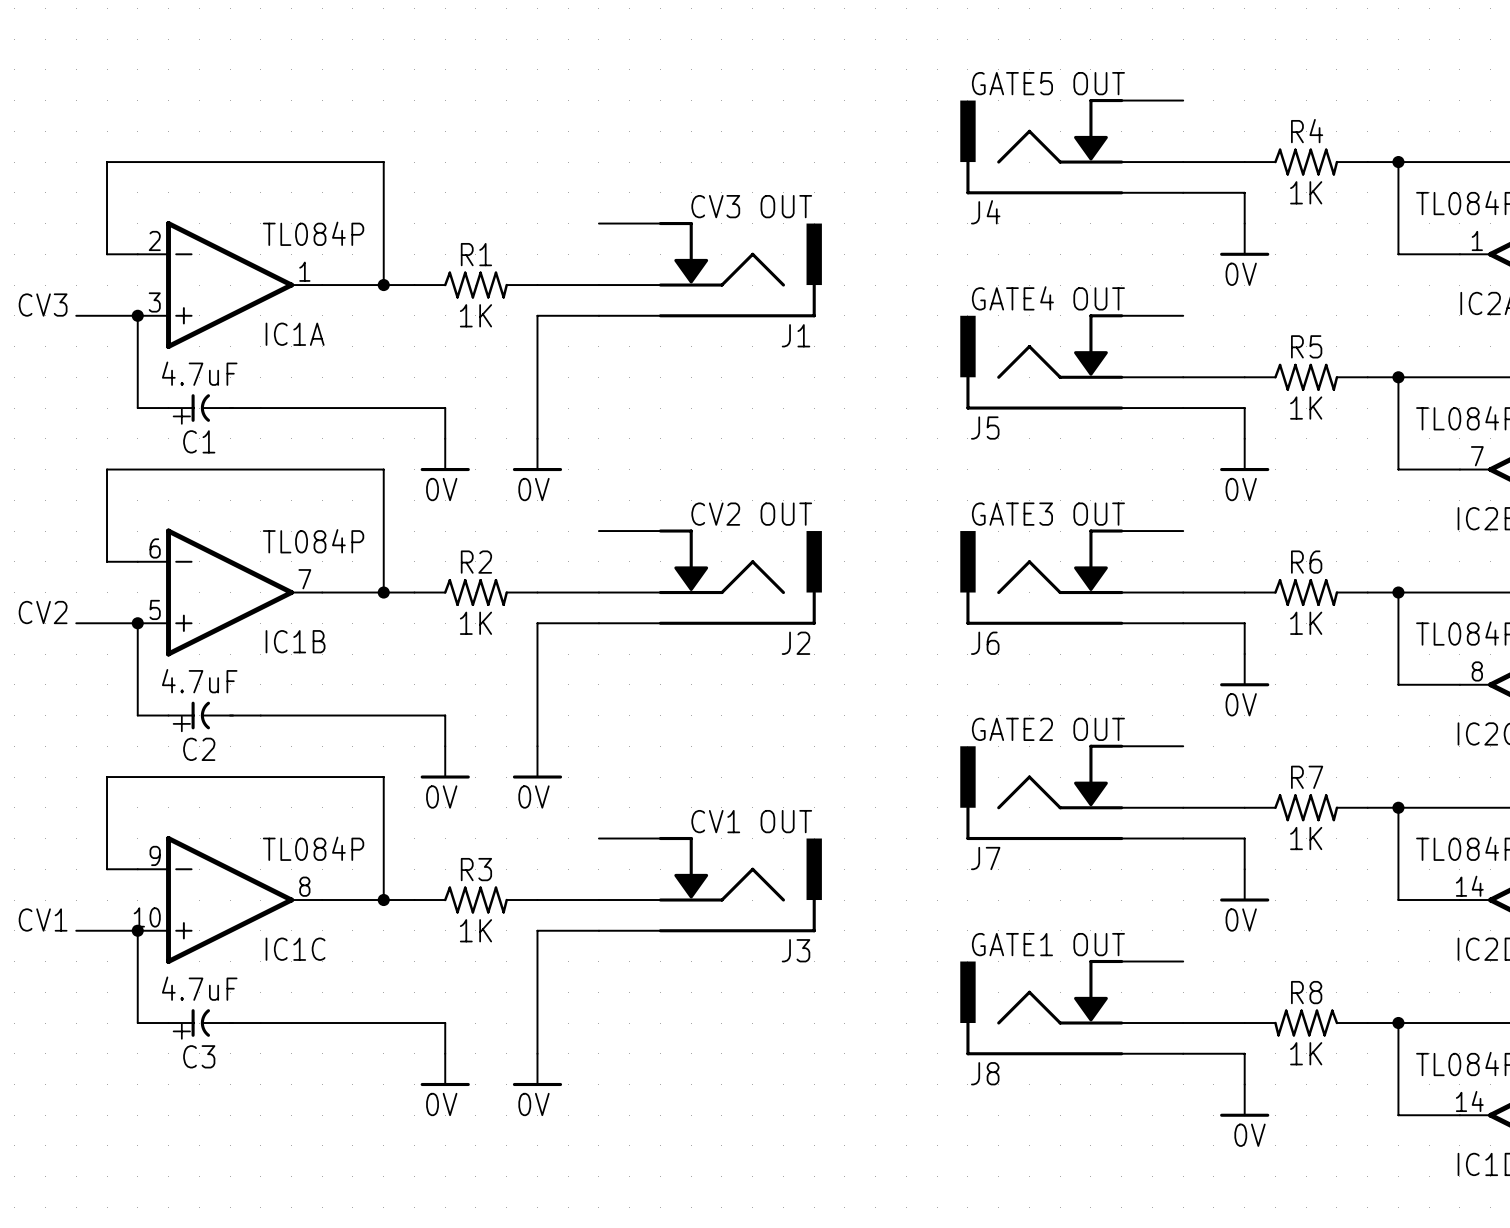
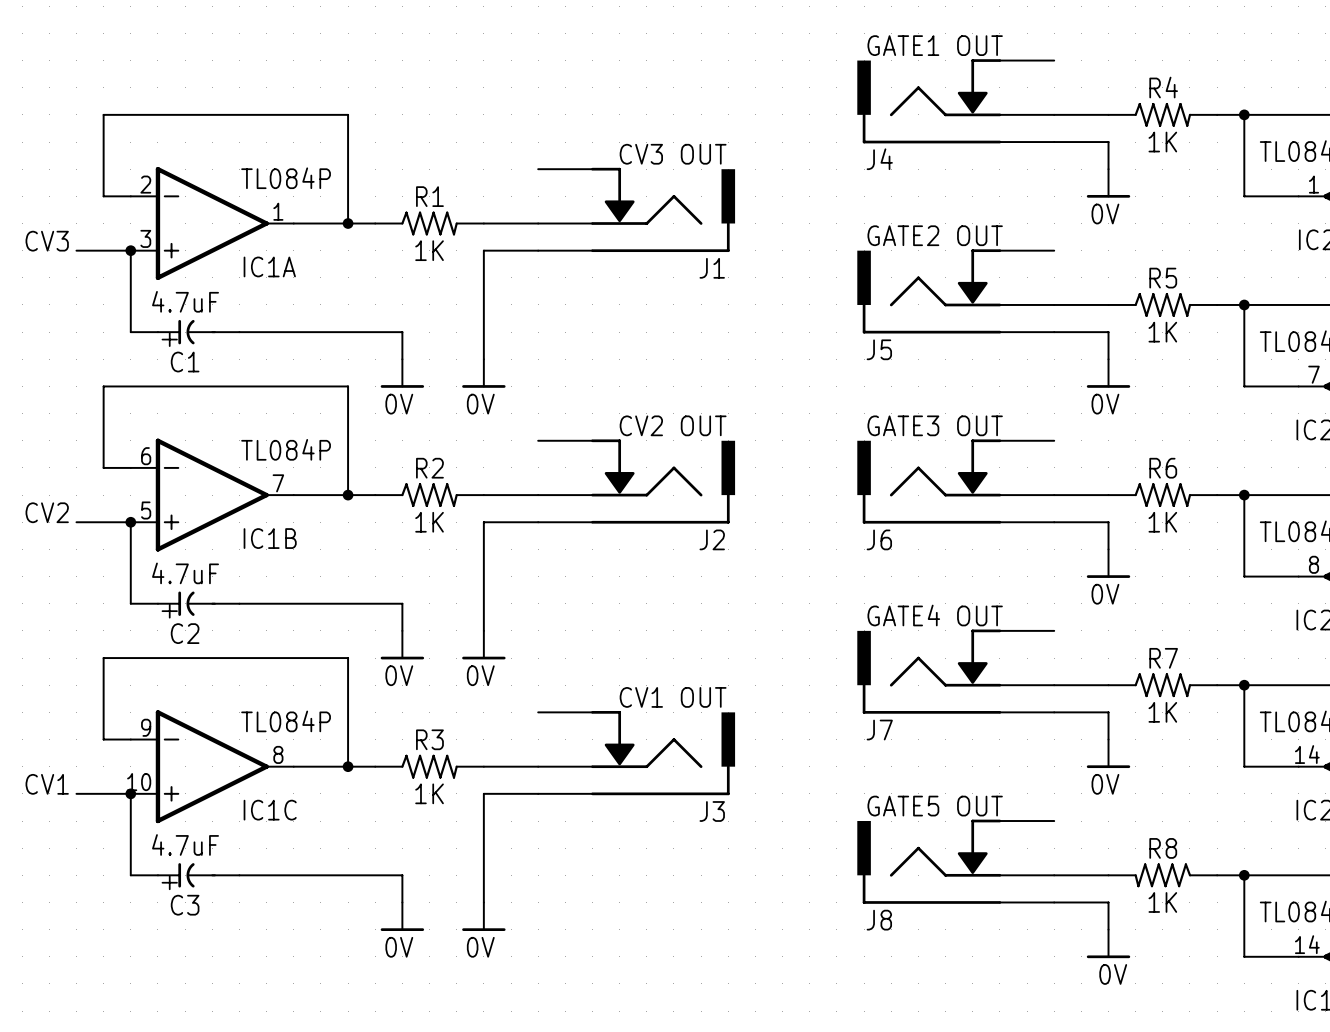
J4 value: GATE5 OUT (1048, 83) -> GATE1 OUT (935, 45)
J5 value: GATE4 OUT (1048, 298) -> GATE2 OUT (935, 235)
J7 value: GATE2 OUT (1048, 729) -> GATE4 OUT (935, 615)
J8 value: GATE1 OUT (1048, 944) -> GATE5 OUT (935, 806)

